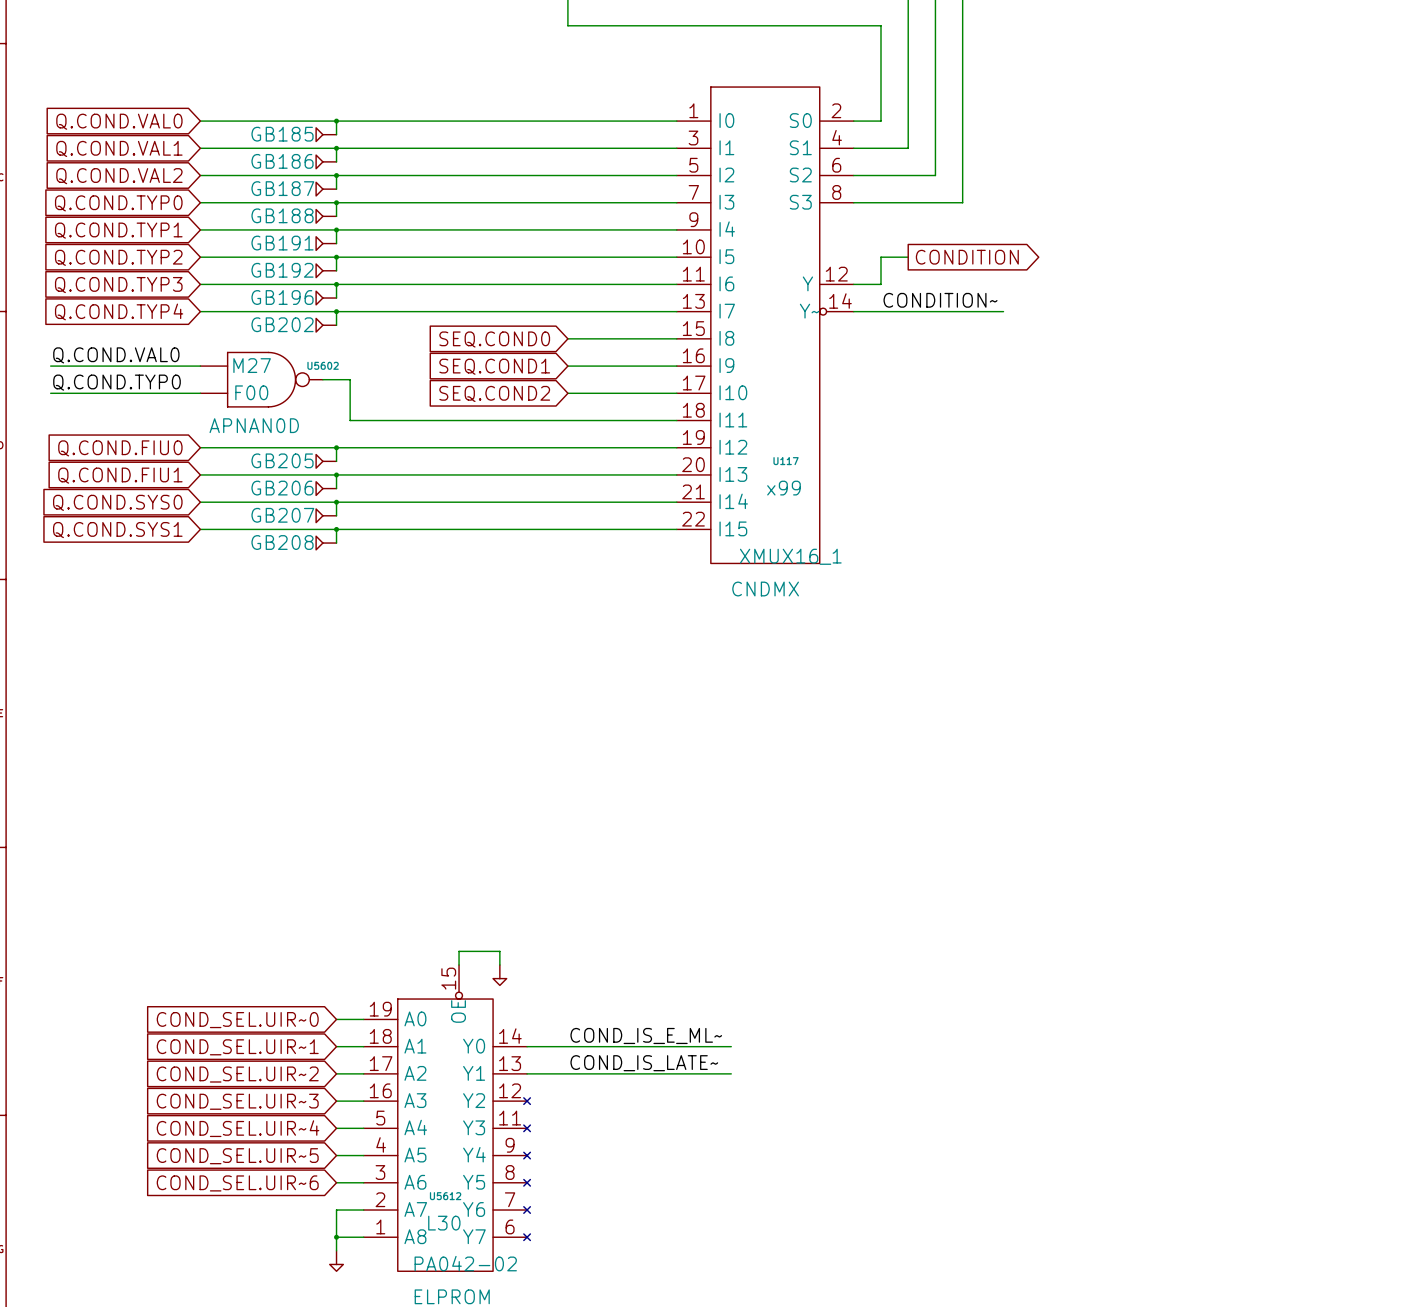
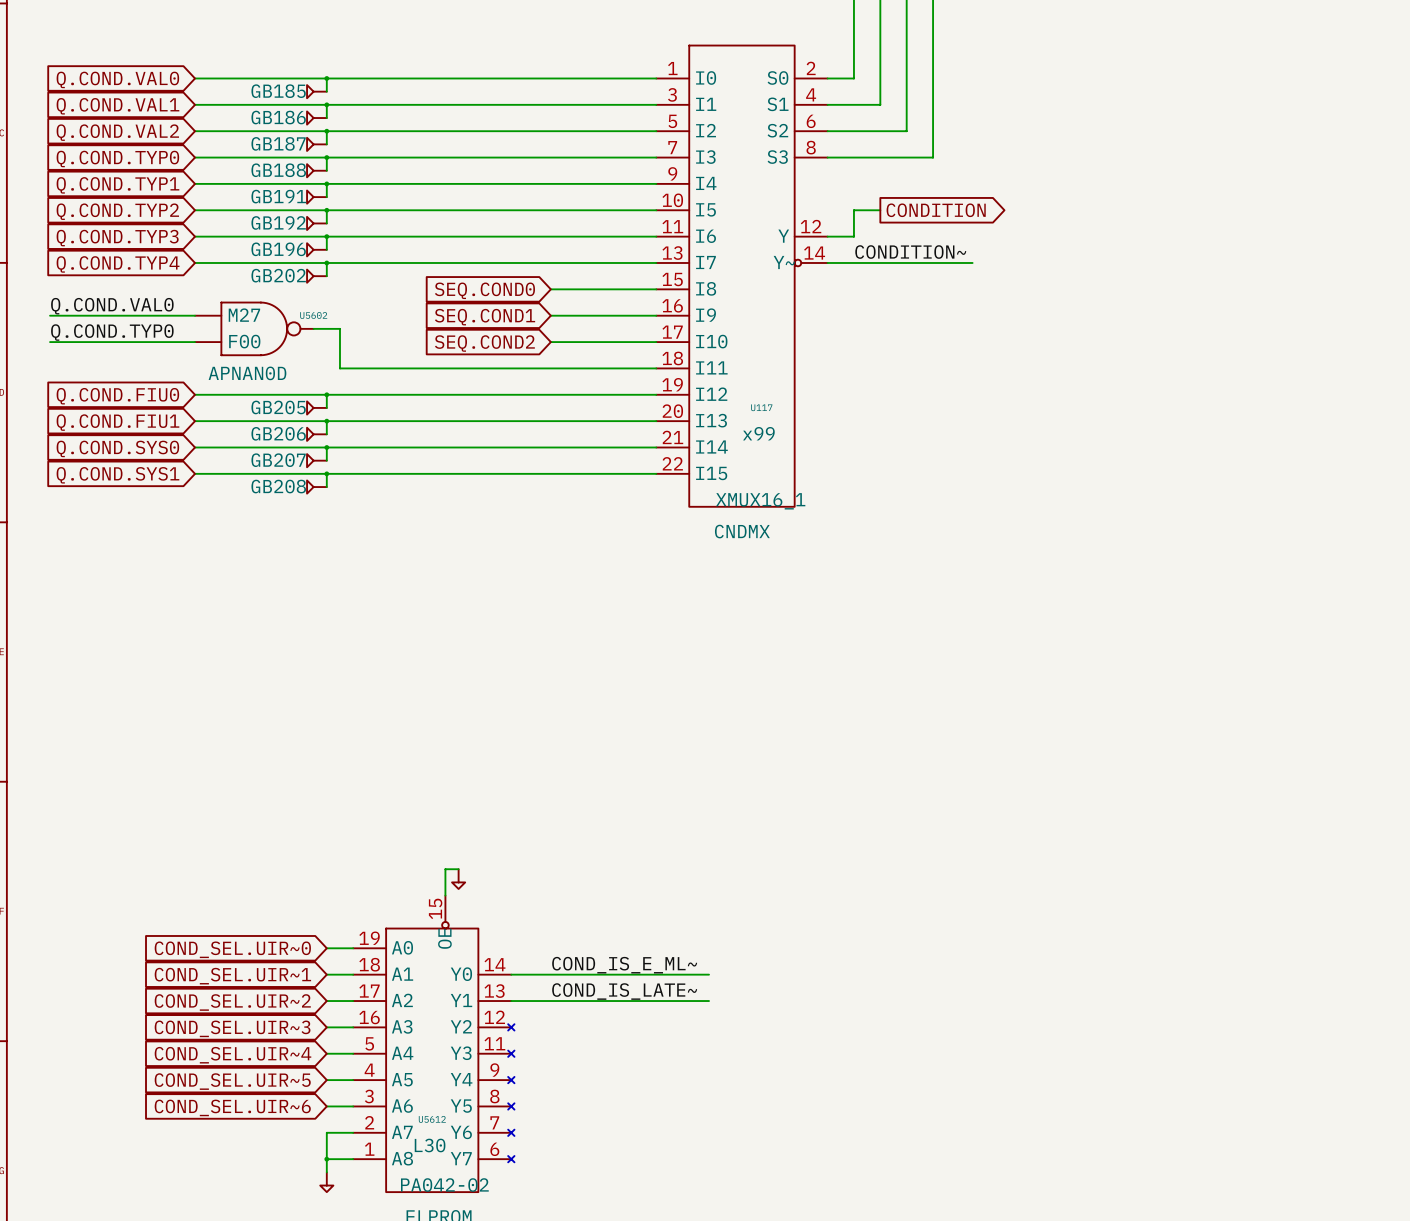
wire: (459, 951) (499, 951) (499, 964) -> (445, 882) (445, 869) (458, 869)
power symbol position: (499, 975) -> (458, 879)

